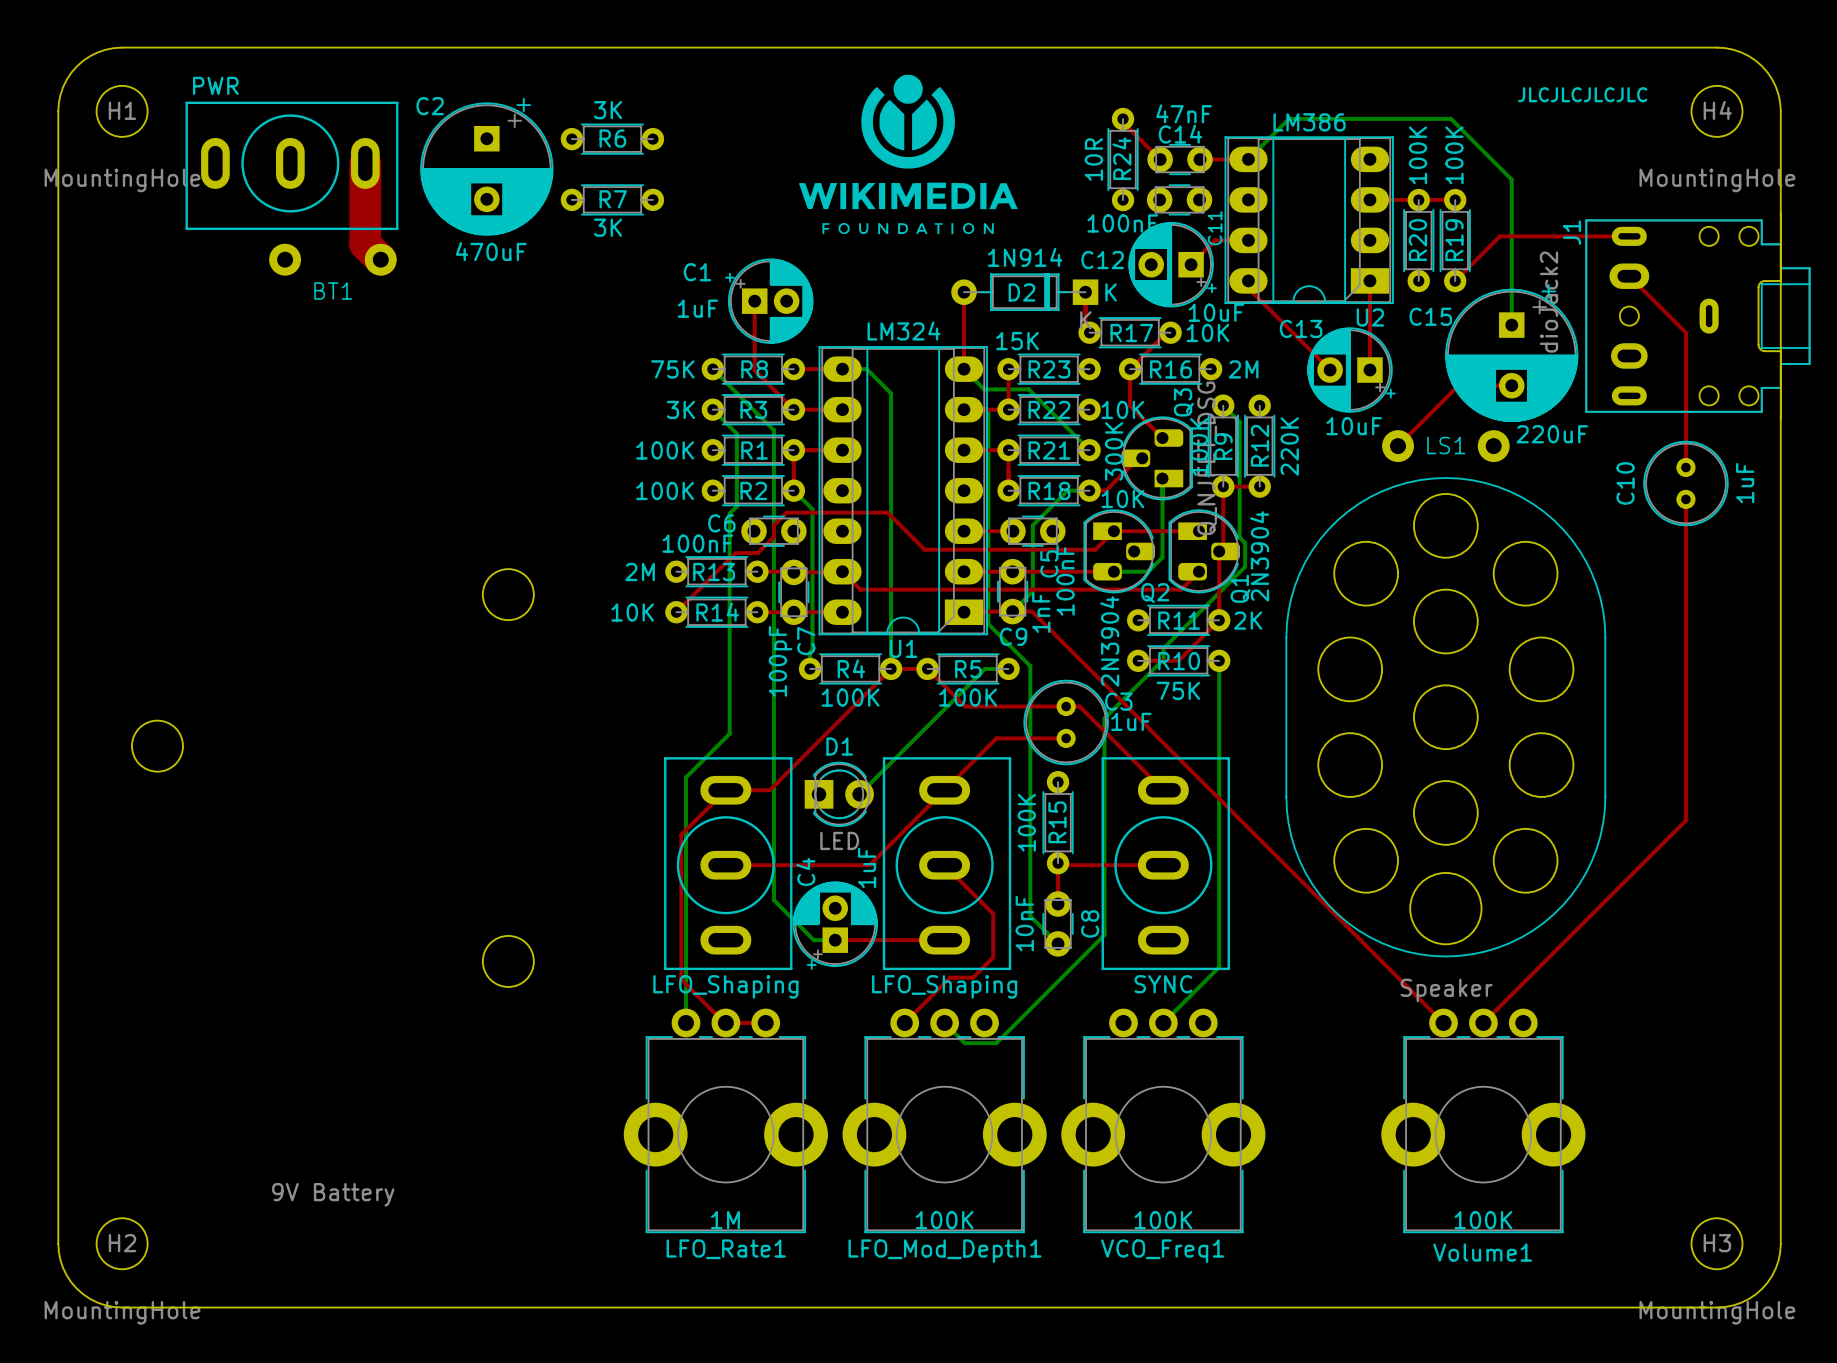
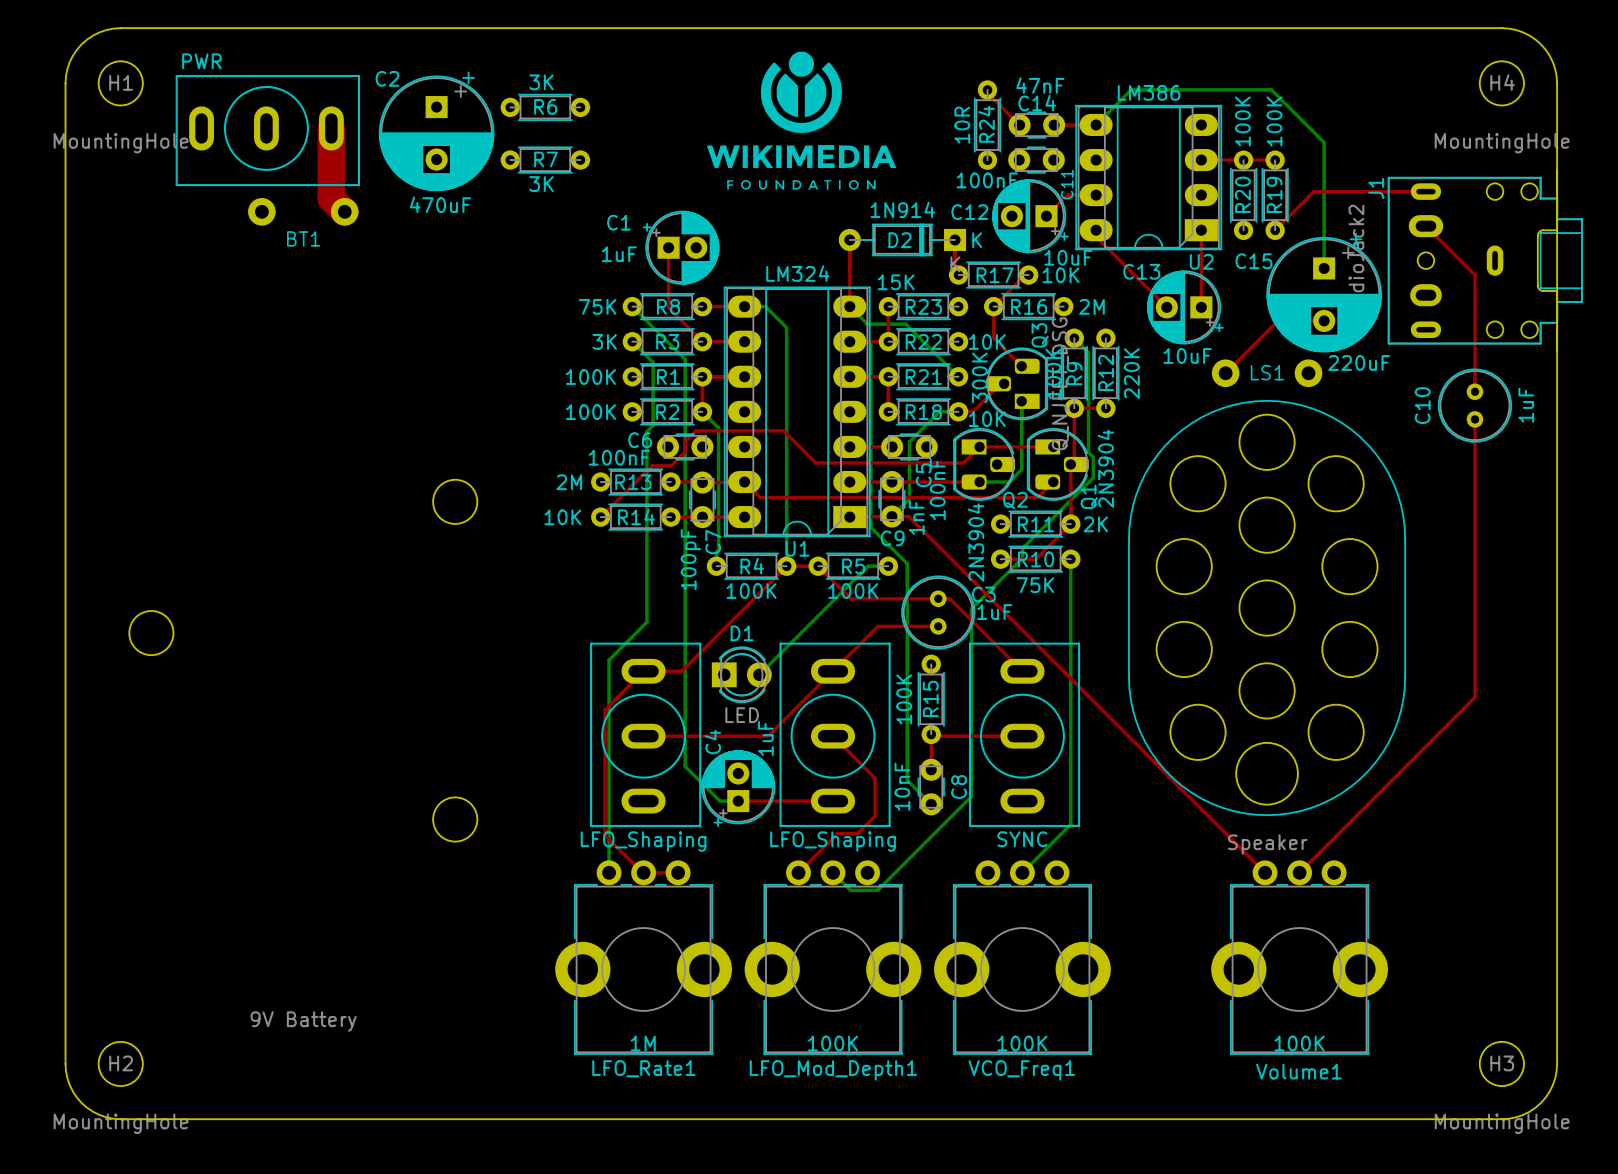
text: JLCJLCJLCJLC (1582, 94) -> none

